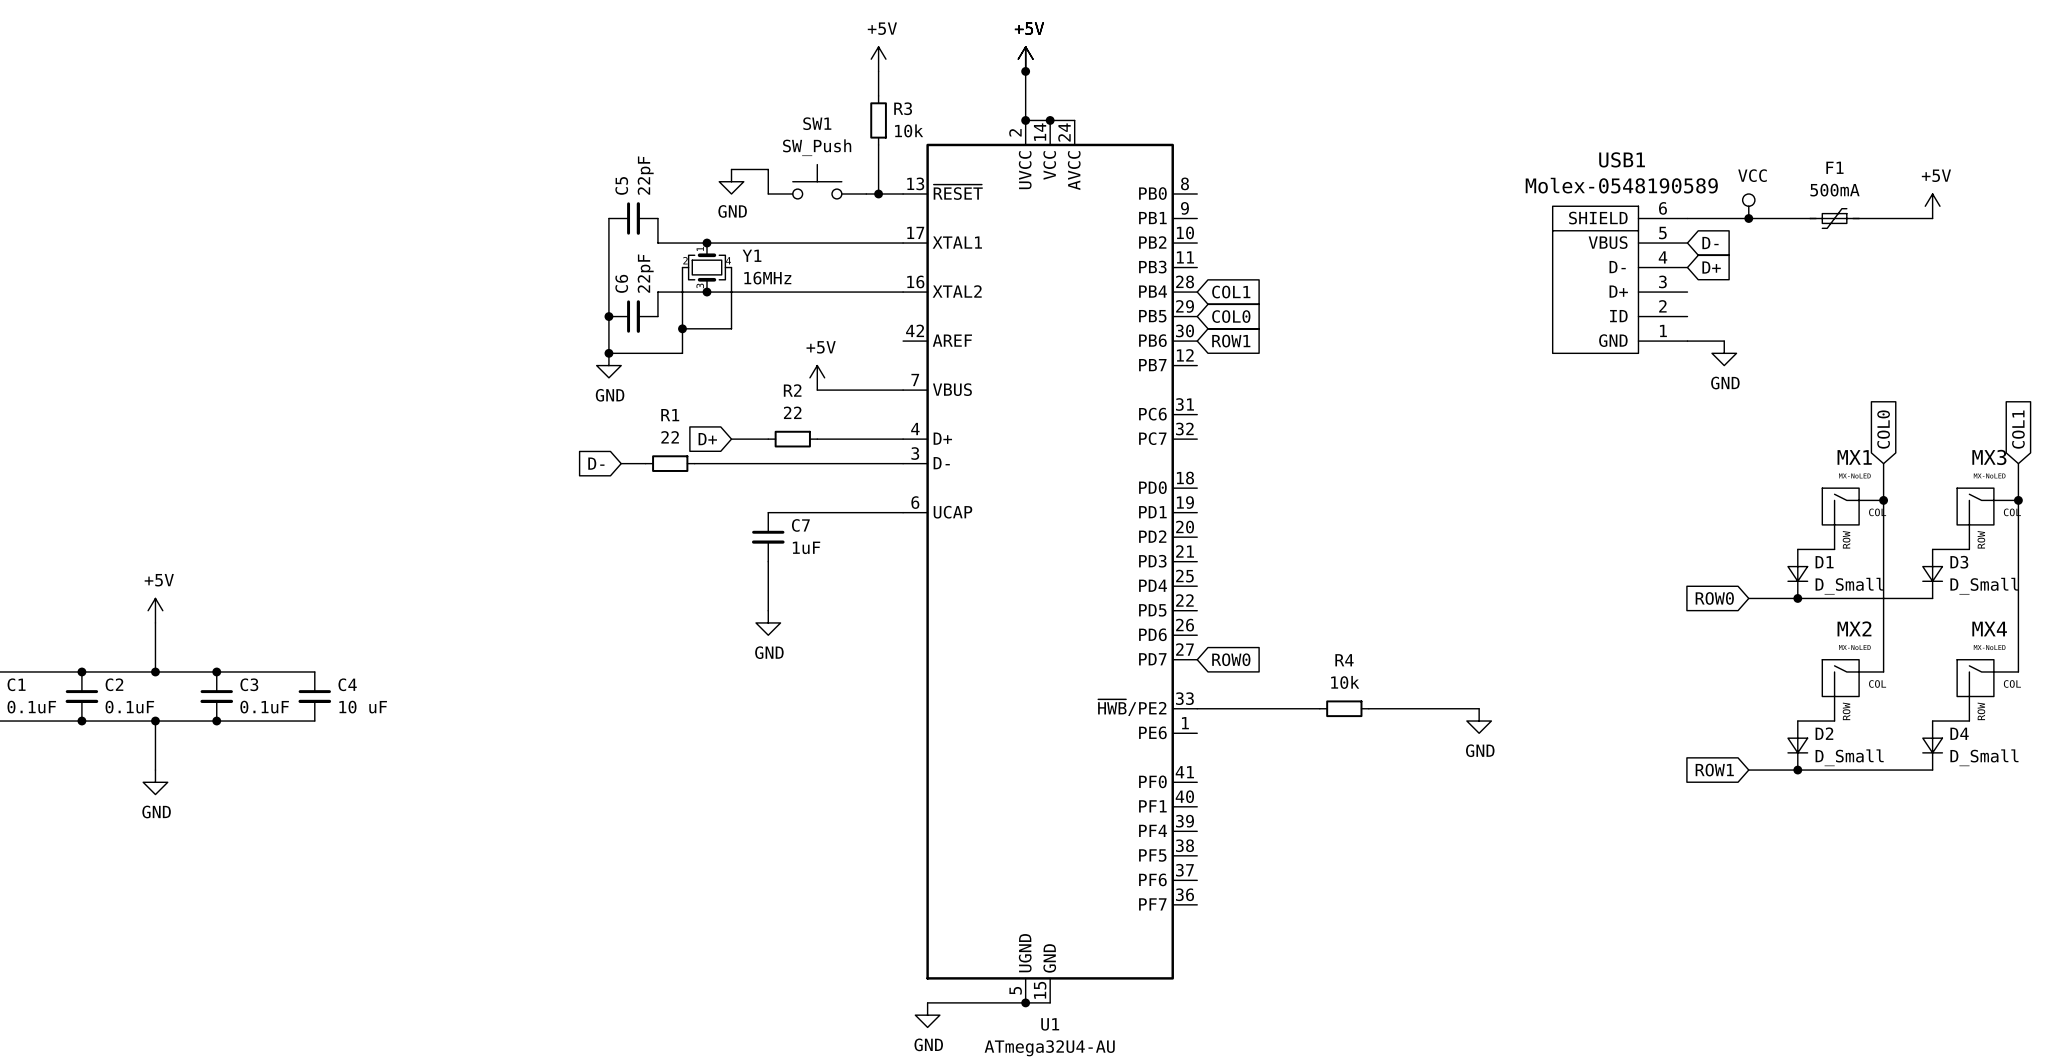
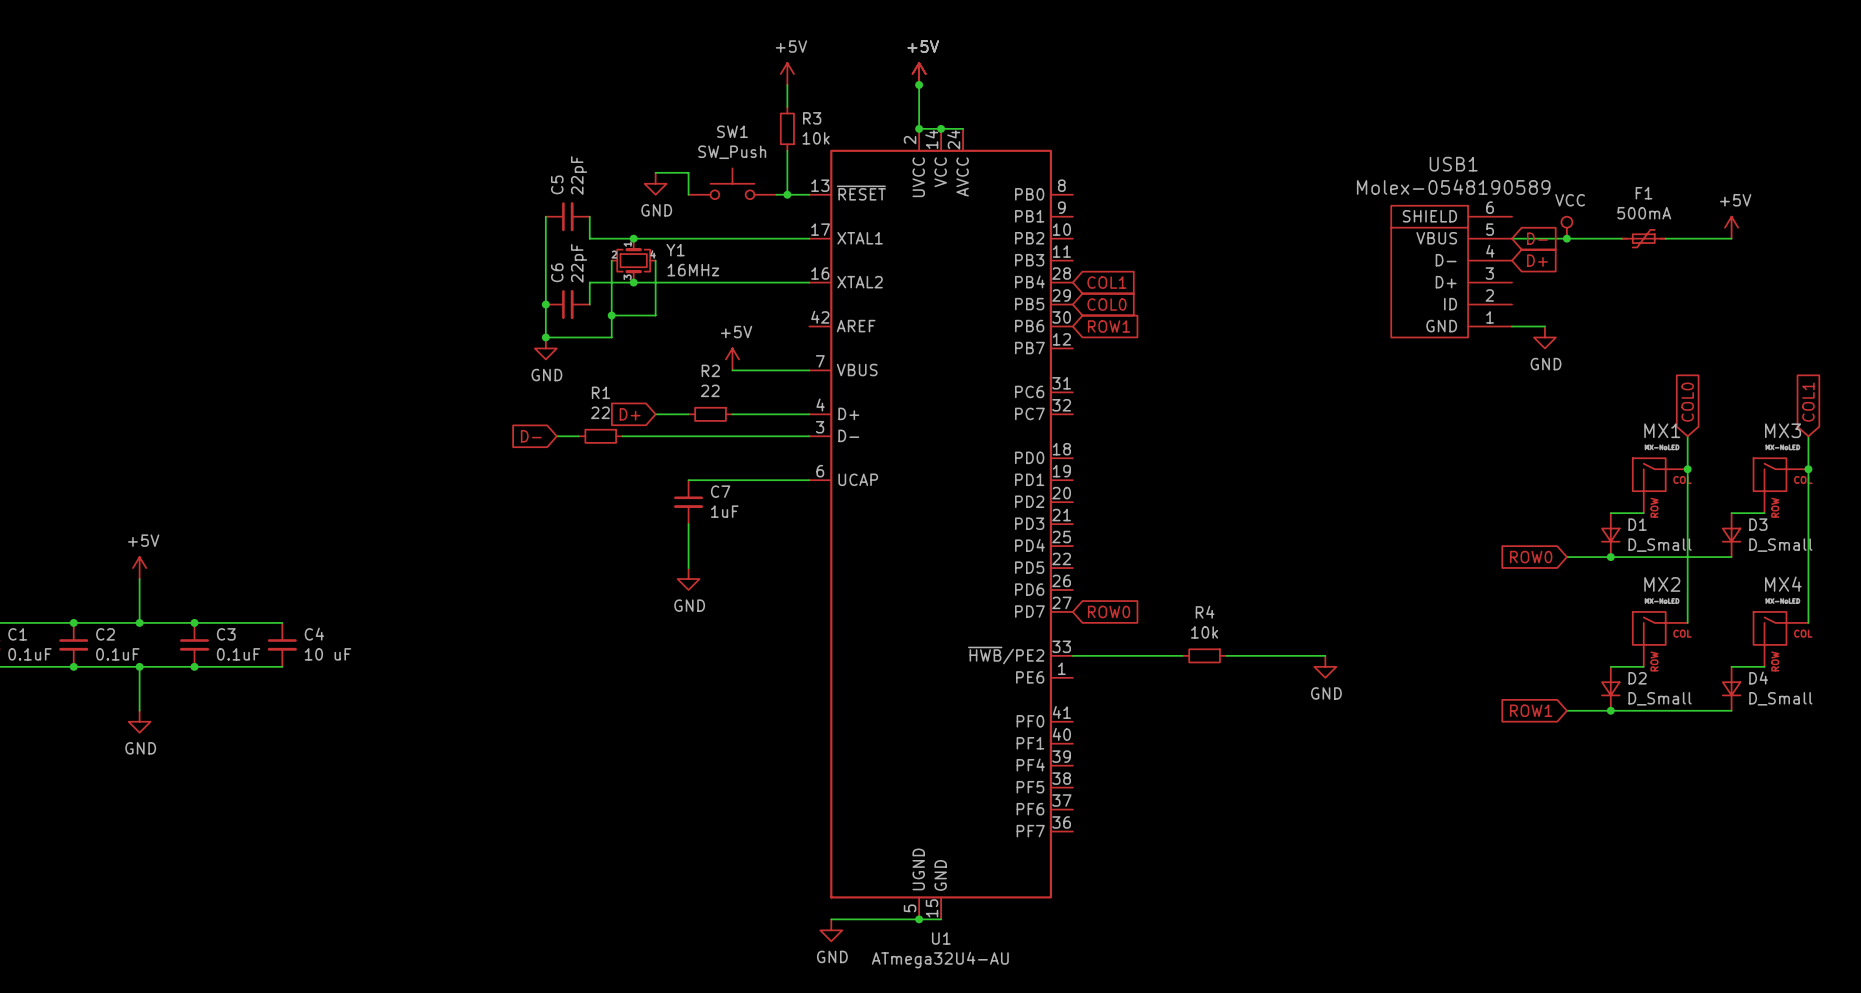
power symbol position: VCC (1748, 206) -> VCC (1566, 227)
power symbol position: +5V (1932, 206) -> +5V (1731, 227)
wire: (1687, 218) (1810, 218) -> (1512, 238) (1621, 238)
junction position: (1748, 218) -> (1566, 238)
F1 position: (1834, 218) -> (1643, 238)
wire: (1859, 218) (1932, 218) -> (1665, 238) (1731, 238)

